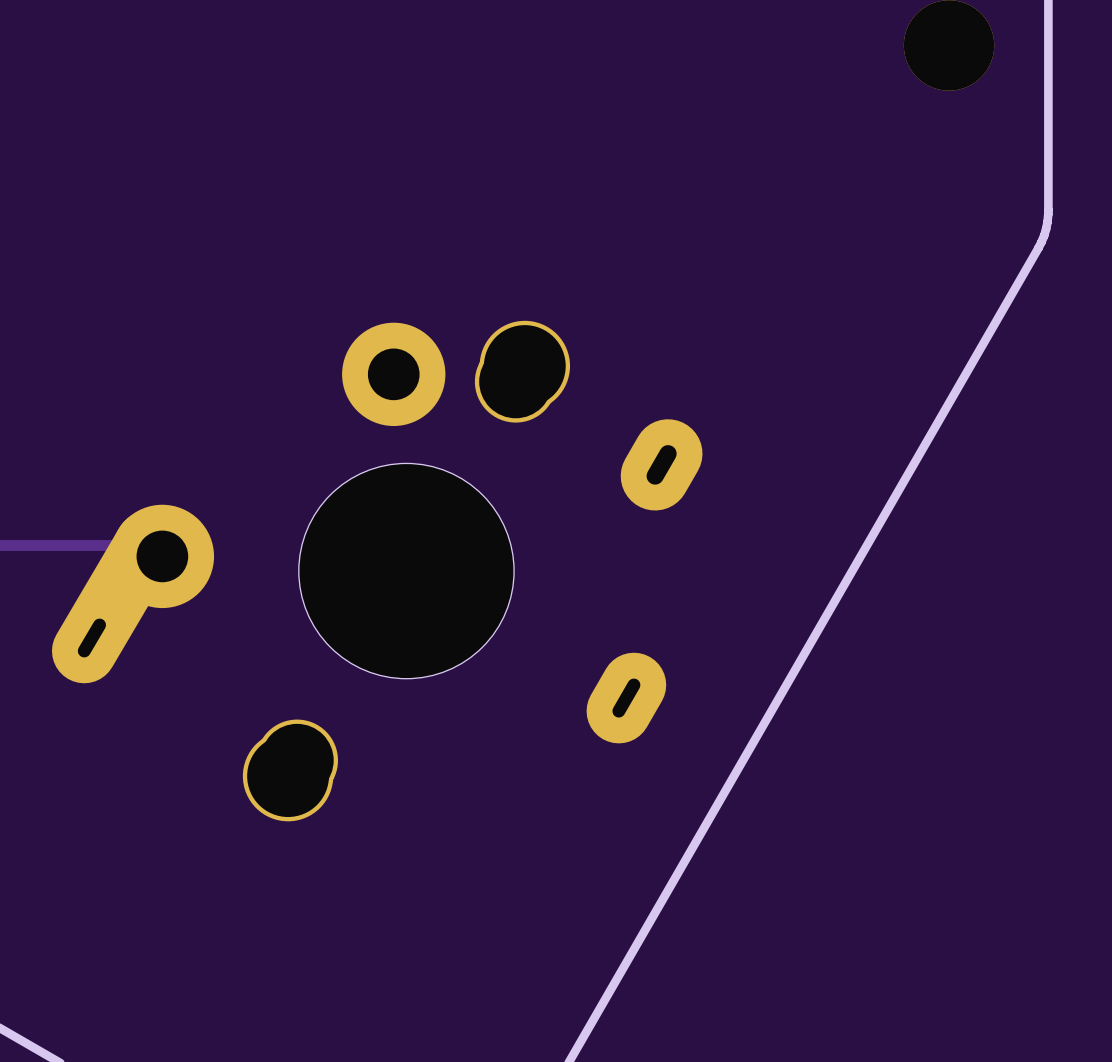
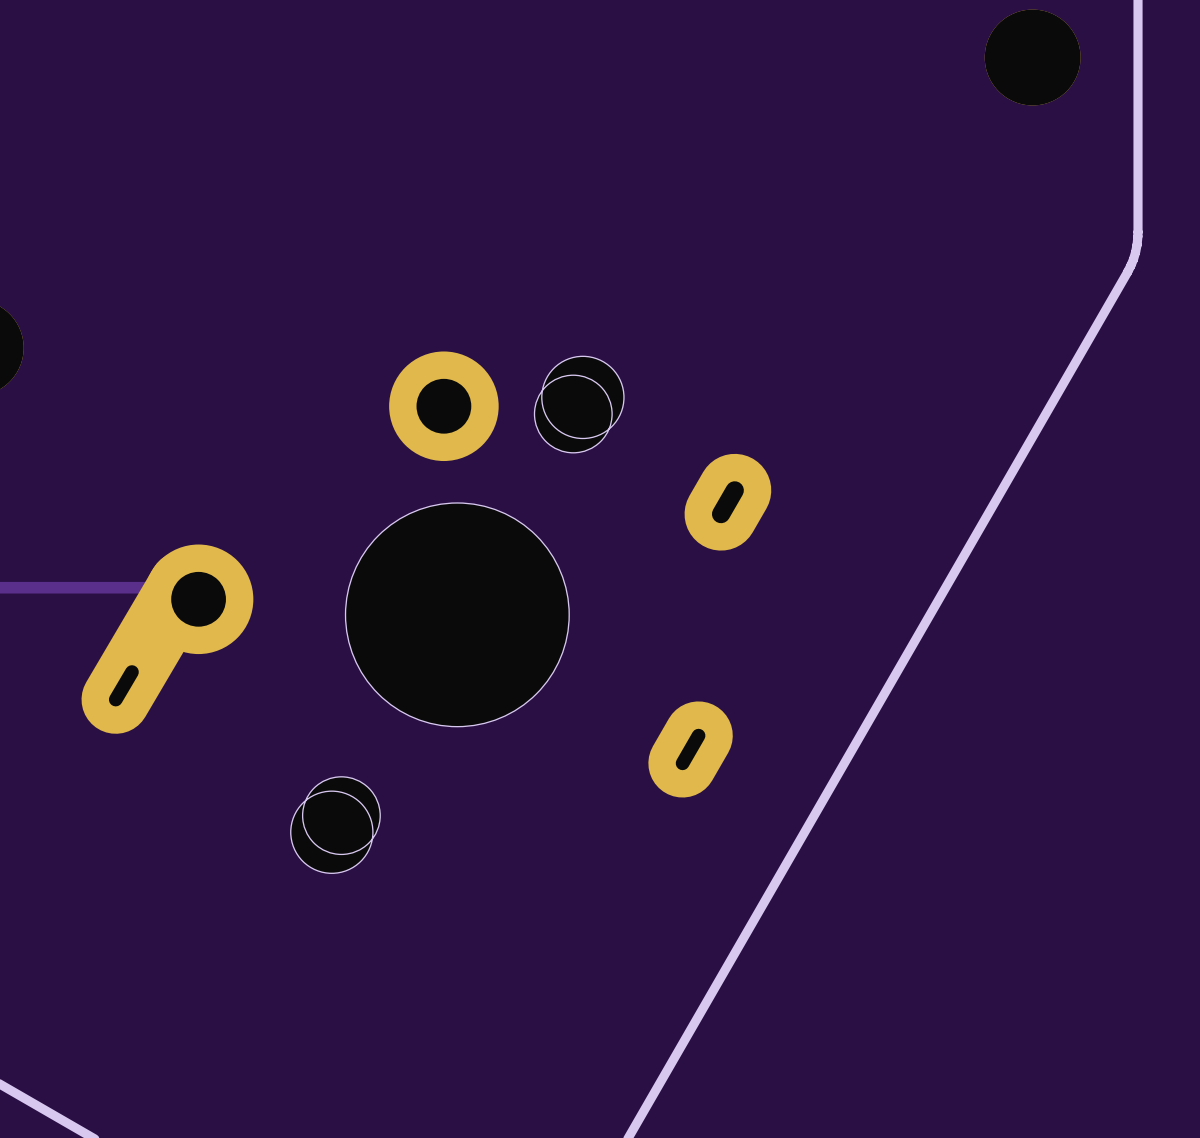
part footprint: [51, 320, 703, 822] -> [81, 351, 772, 874]

